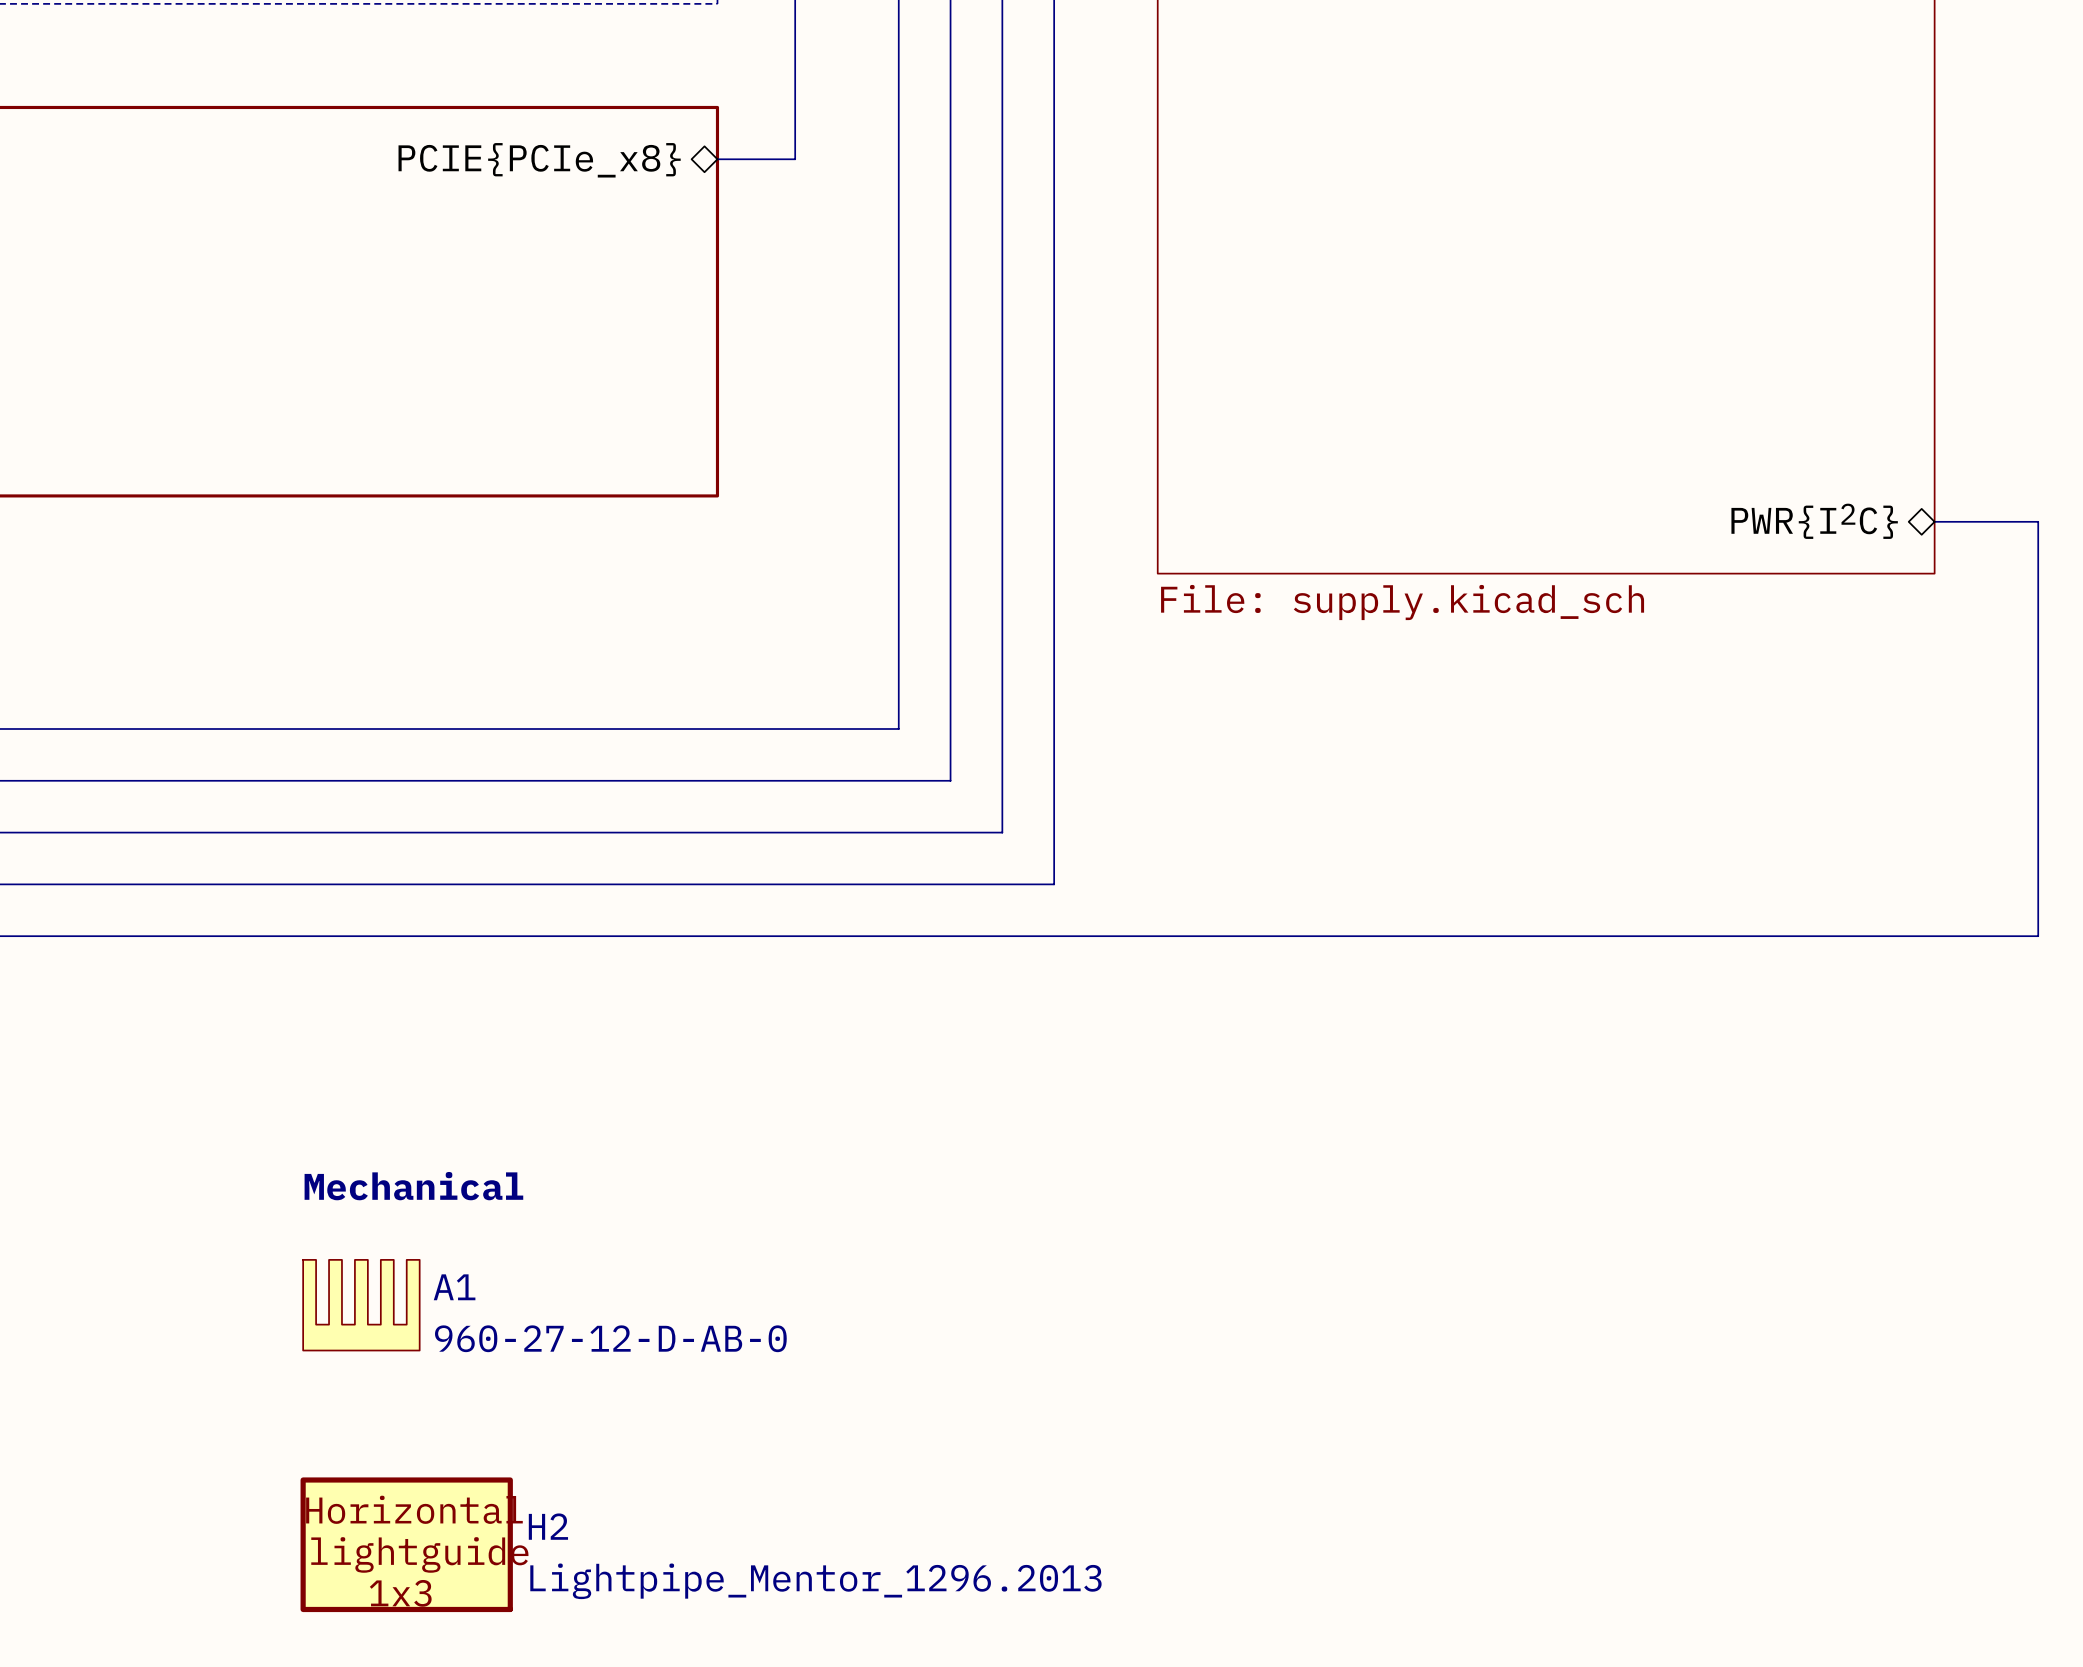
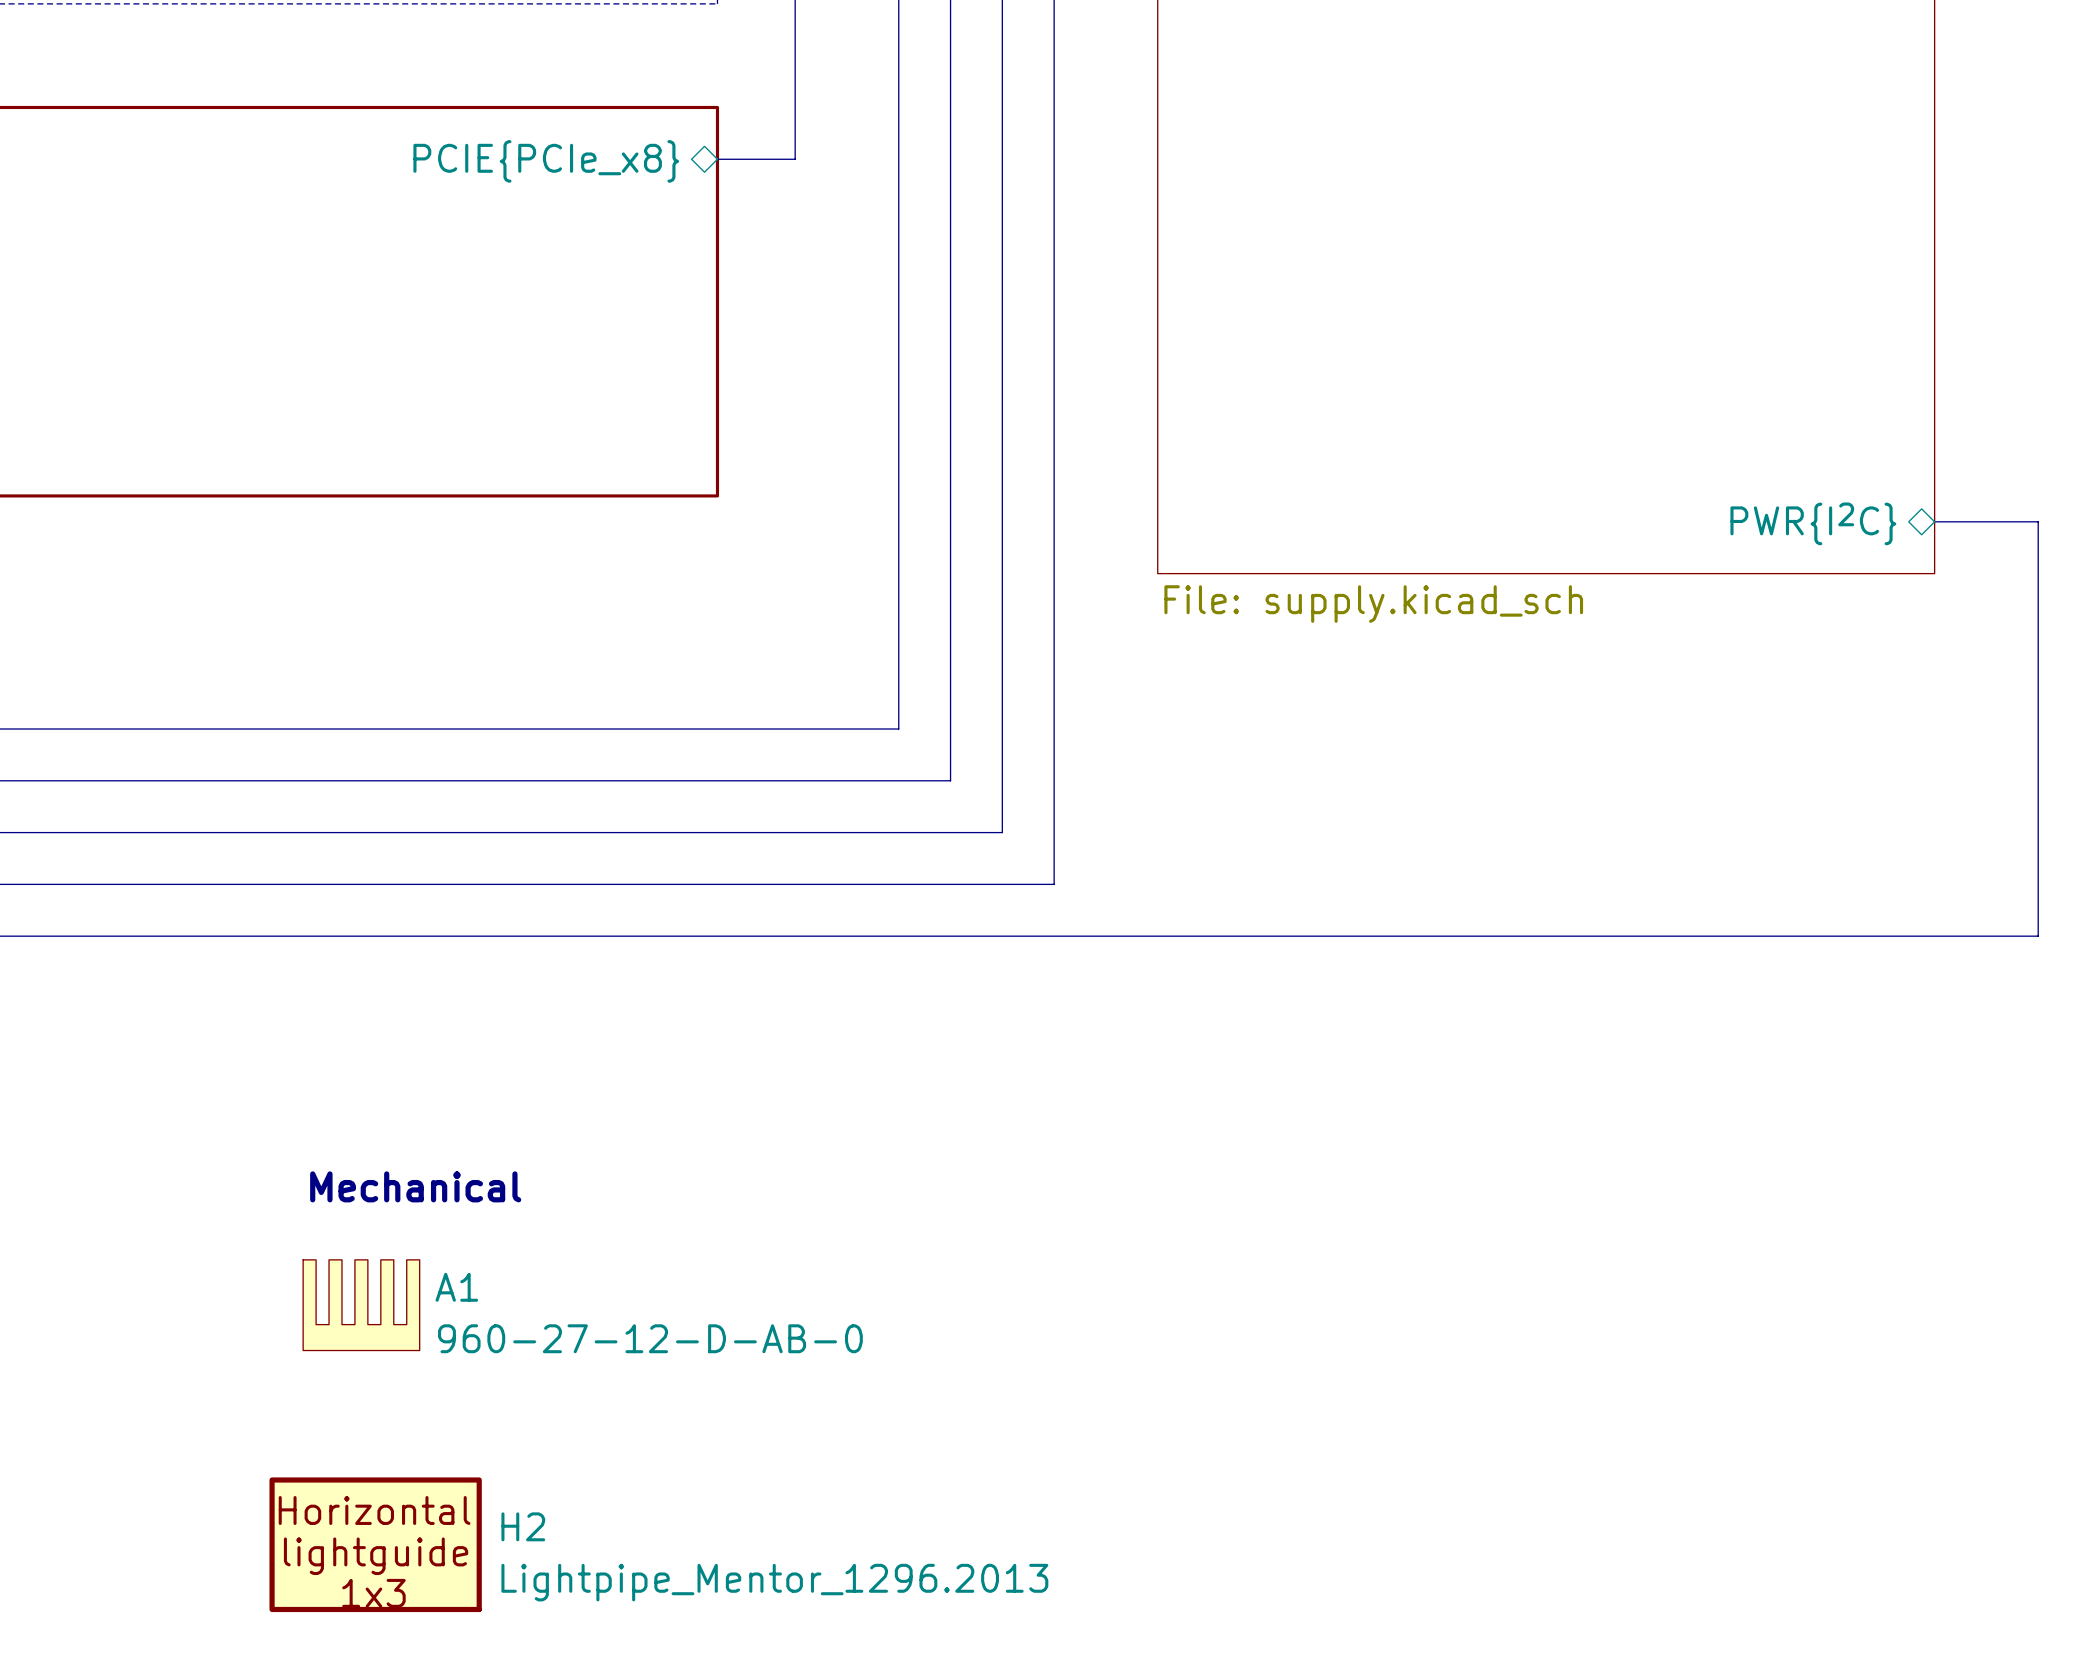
H2 position: (406, 1544) -> (375, 1544)

